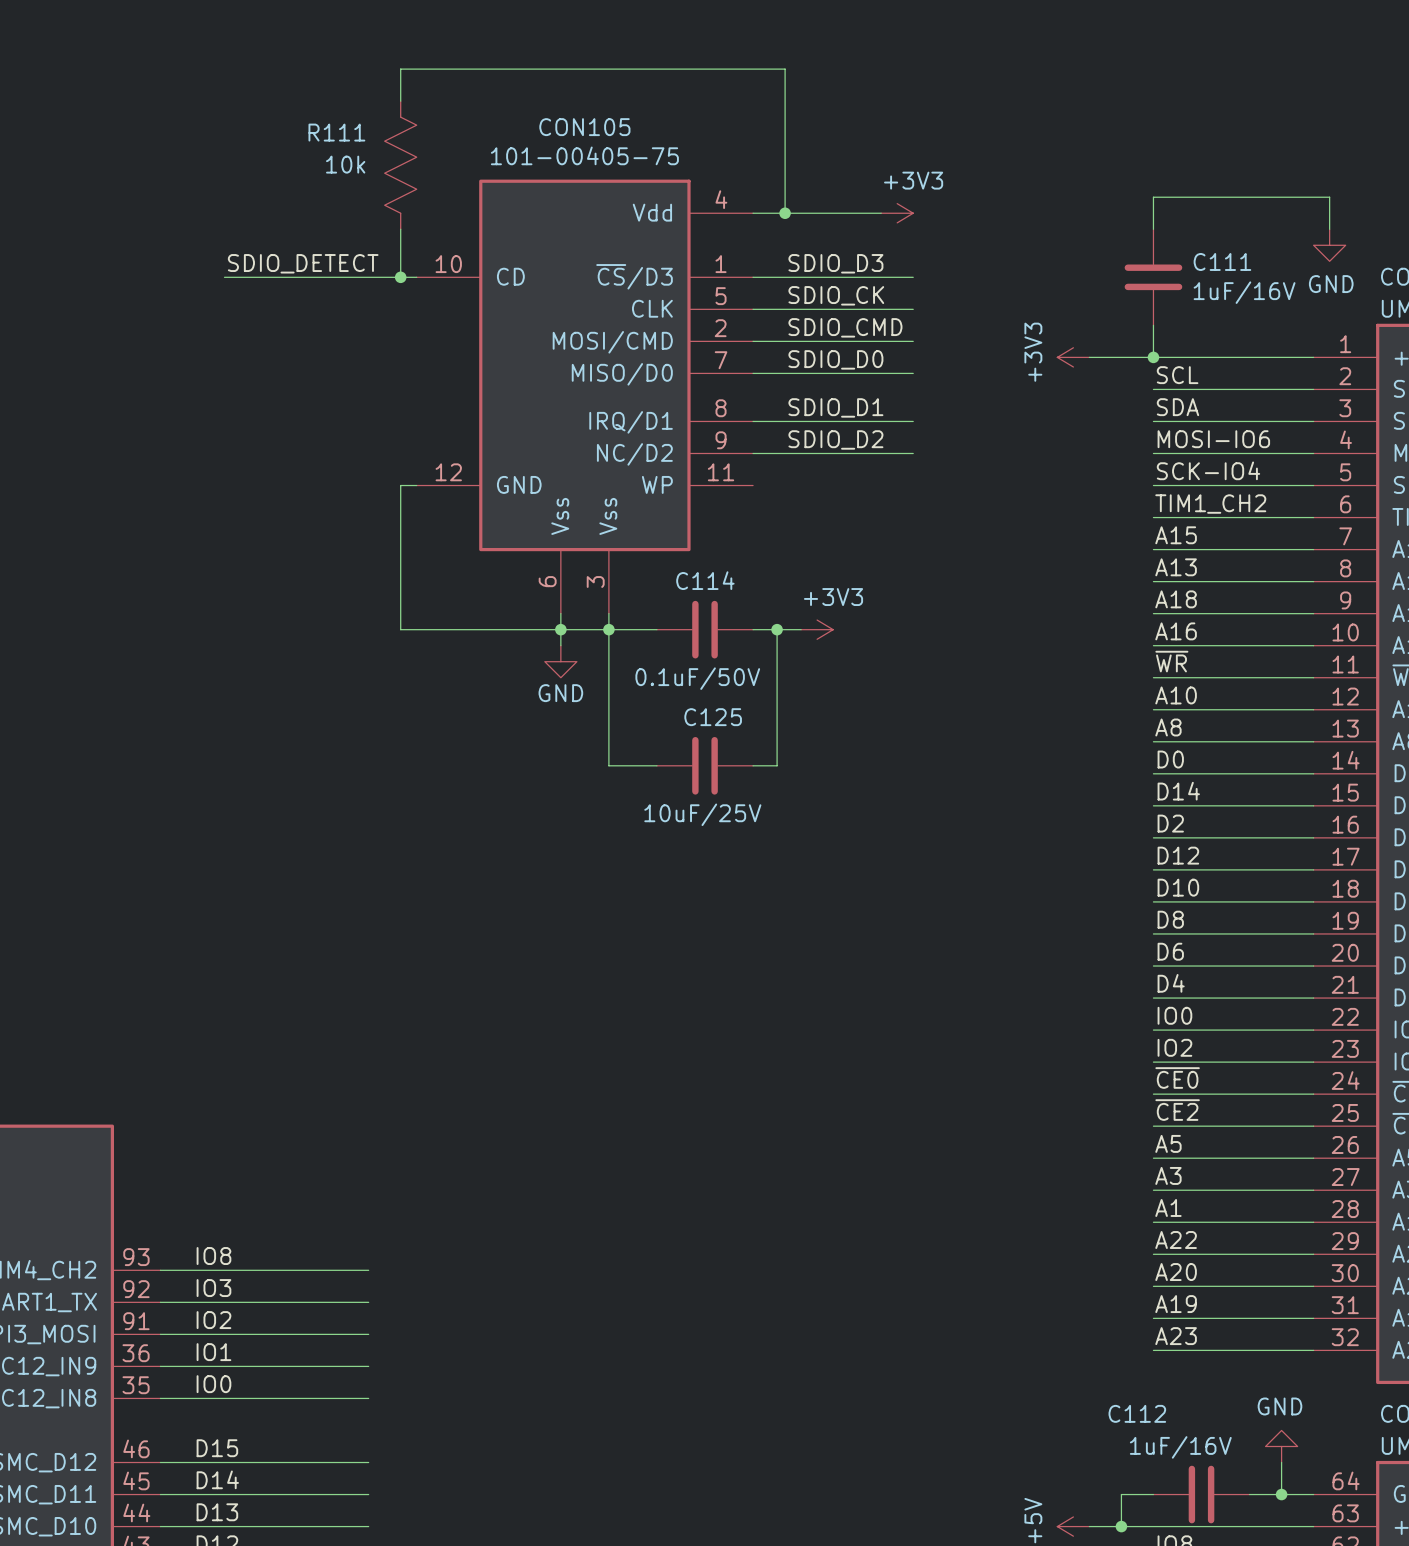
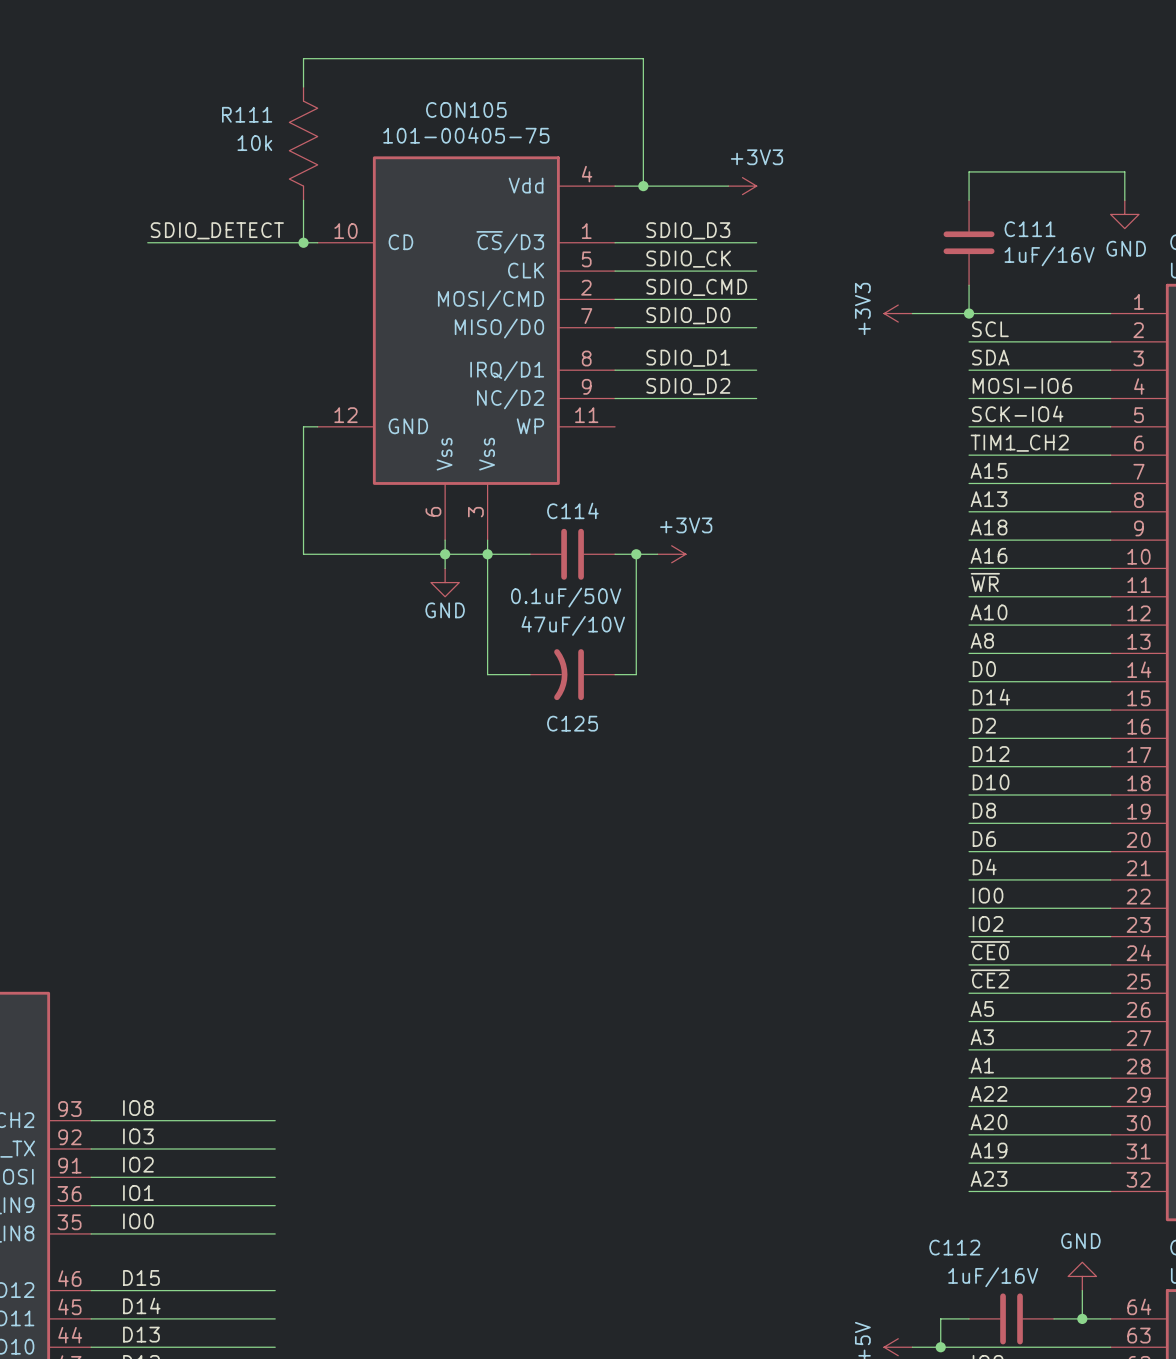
C125 name position: C125 (713, 717) -> C125 (572, 723)
C125 symbol: [656, 736, 754, 795] -> [530, 649, 616, 701]
C125 value: 10uF/25V (702, 814) -> 47uF/10V (573, 625)

